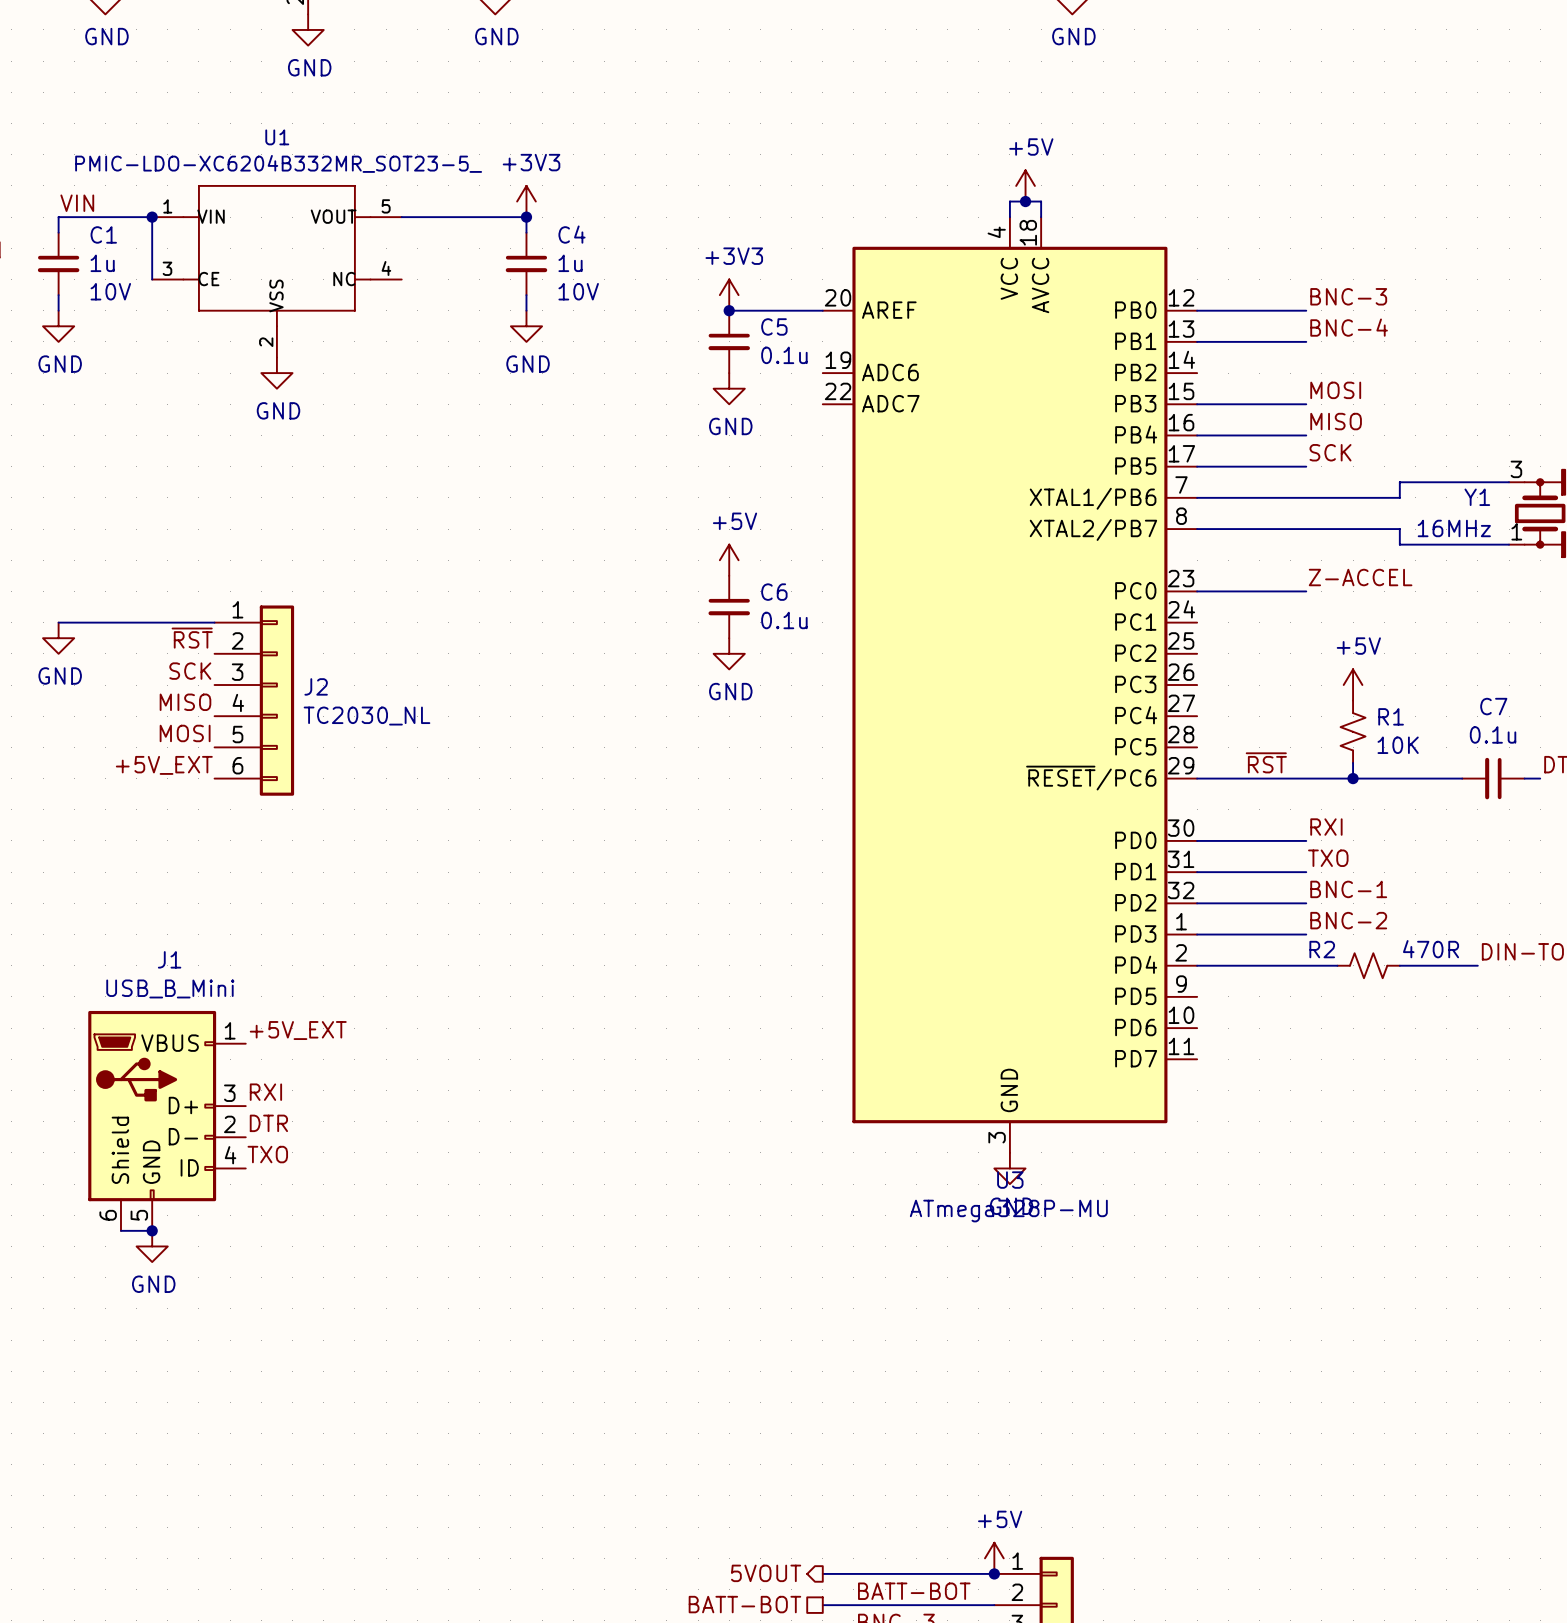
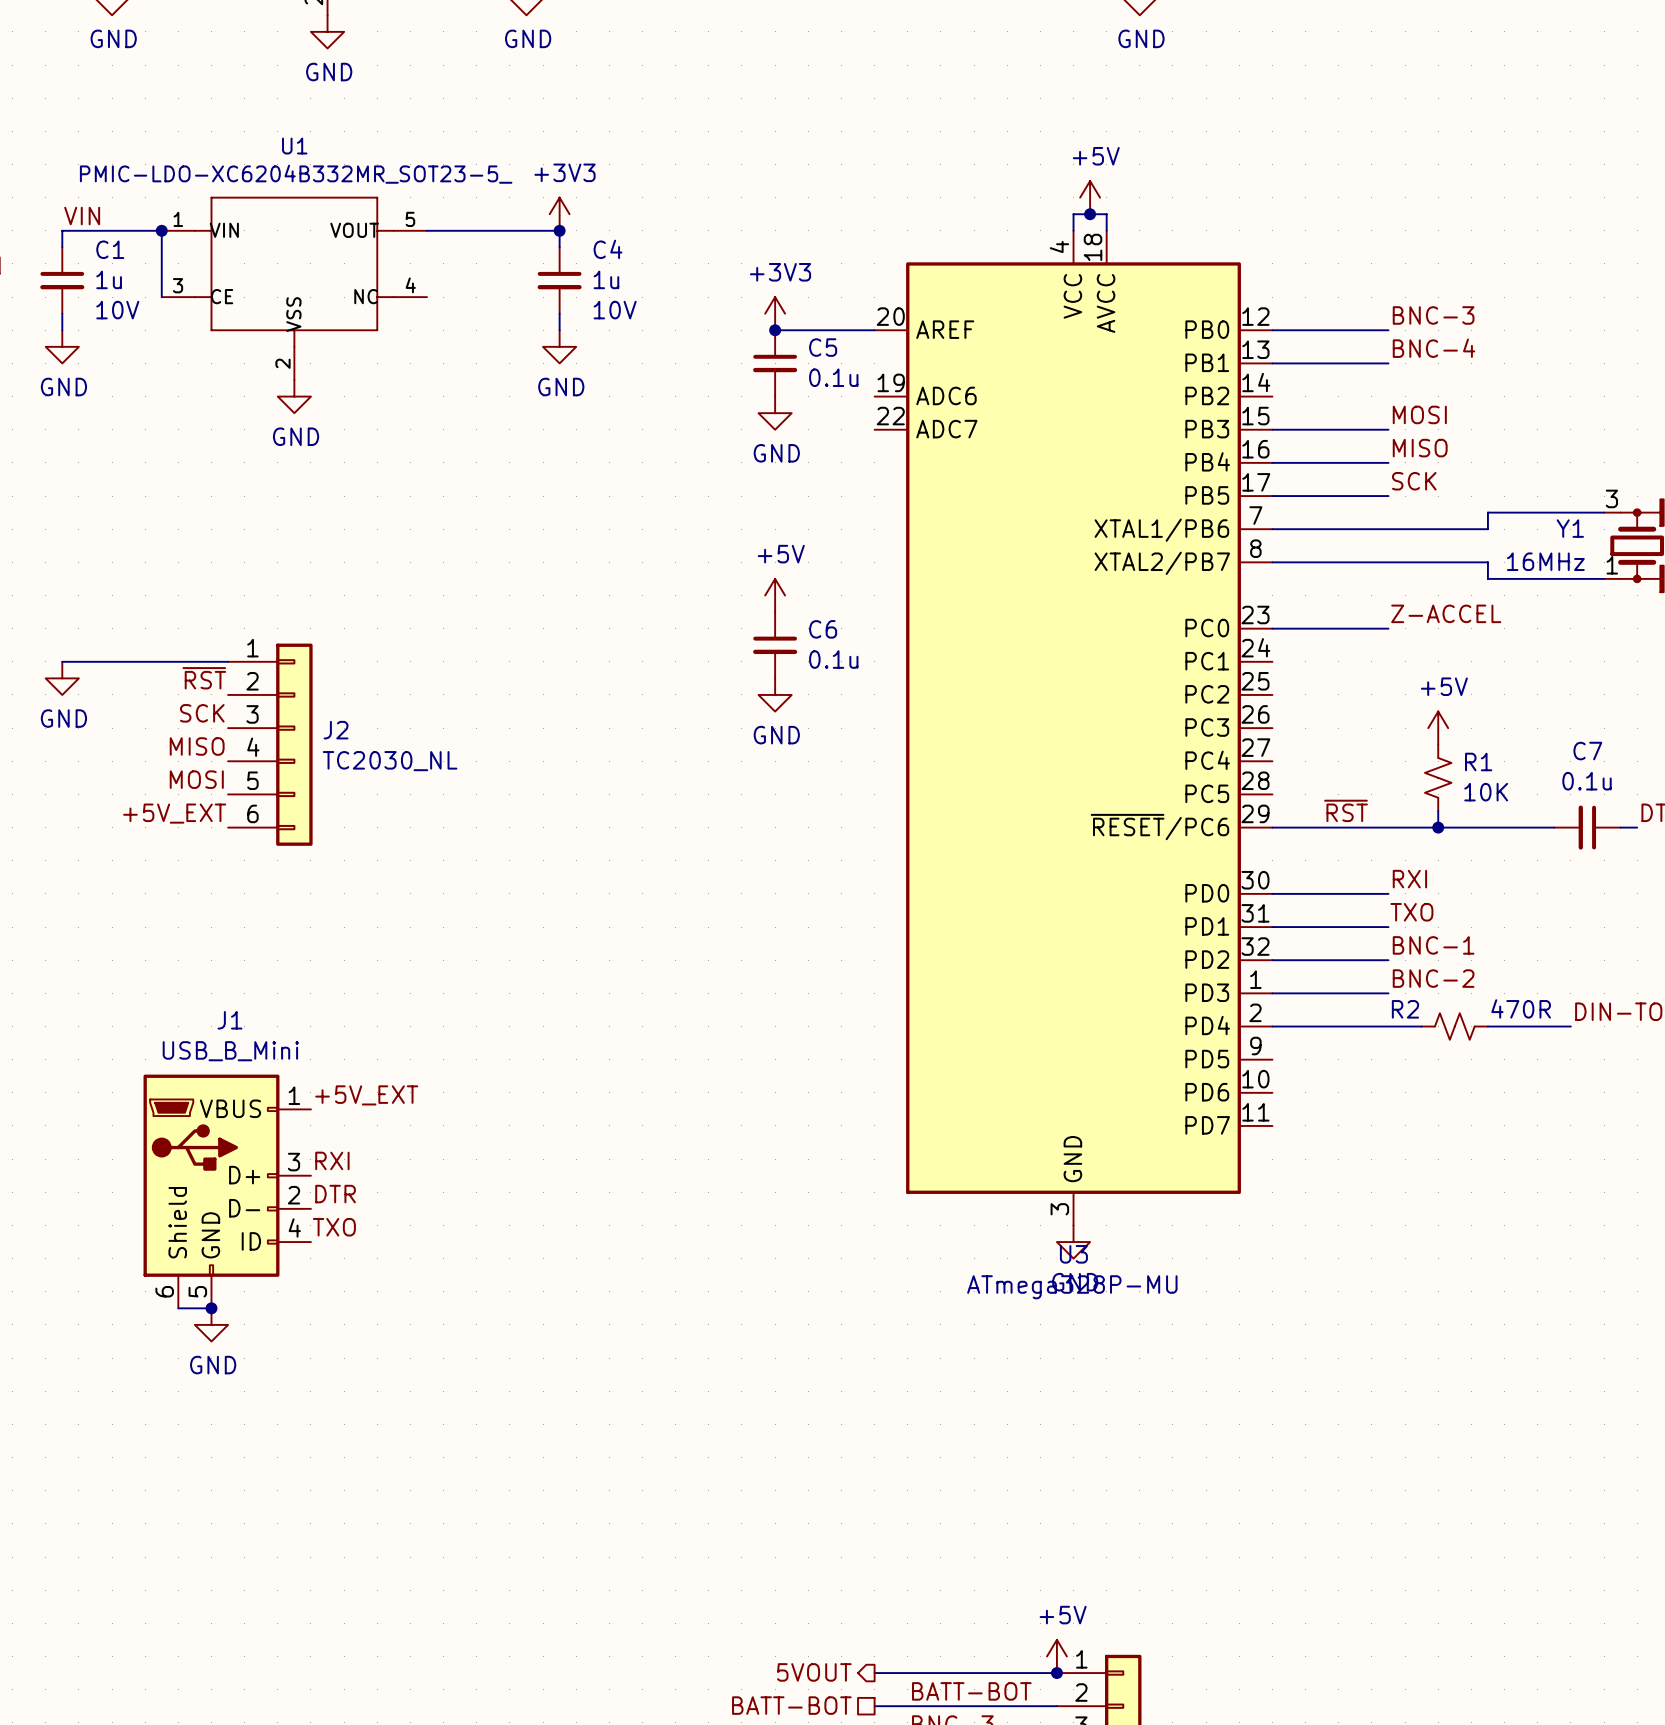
label position: +5V_EXT (298, 1030) -> +5V_EXT (366, 1095)
label position: RXI (265, 1092) -> RXI (332, 1160)
J1 position: (167, 1120) -> (227, 1191)
label position: DTR (268, 1123) -> DTR (335, 1194)
label position: TXO (267, 1154) -> TXO (334, 1227)
wire: (120, 1230) (152, 1230) -> (178, 1308) (211, 1308)
junction position: (152, 1230) -> (211, 1308)
power symbol position: GND (152, 1246) -> GND (211, 1324)

